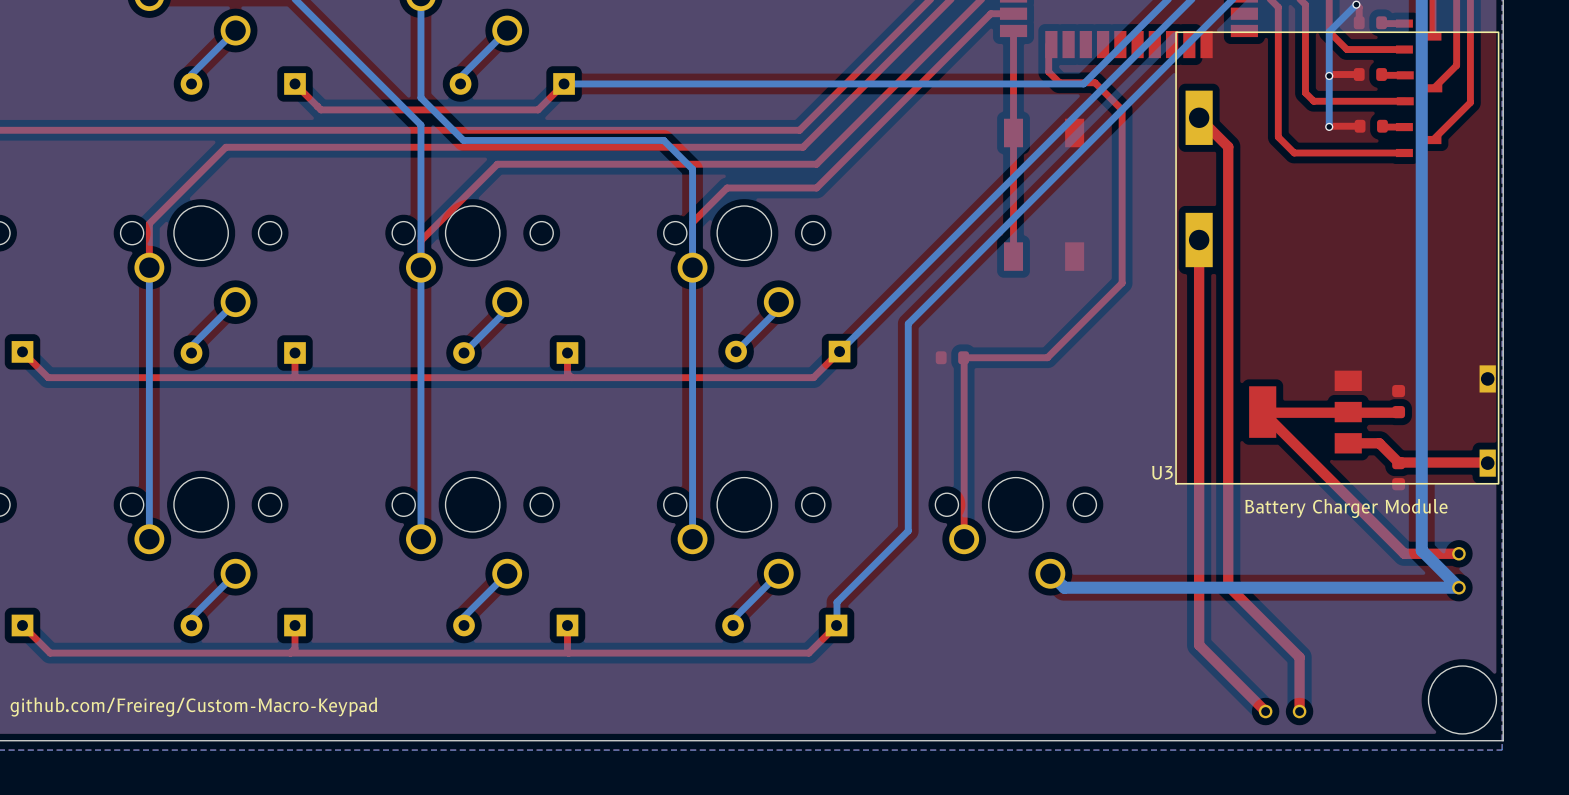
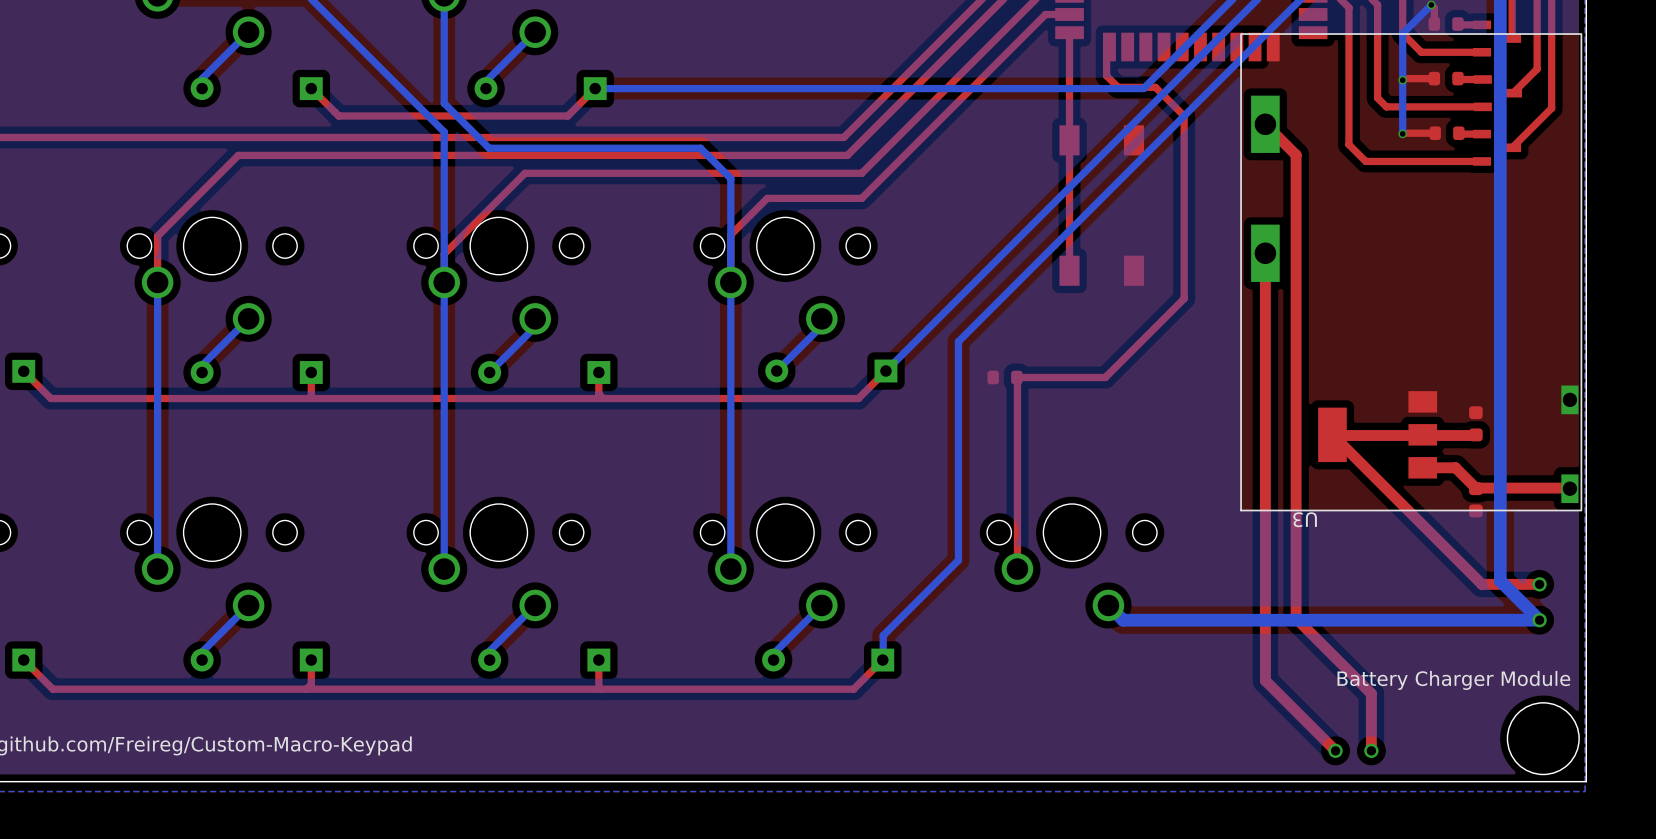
U3 name rotation: 0° (1162, 472) -> 180° (1305, 519)
U3 name position: U3 (1162, 472) -> U3 (1305, 519)
text position: Battery Charger Module (1346, 508) -> Battery Charger Module (1453, 680)

